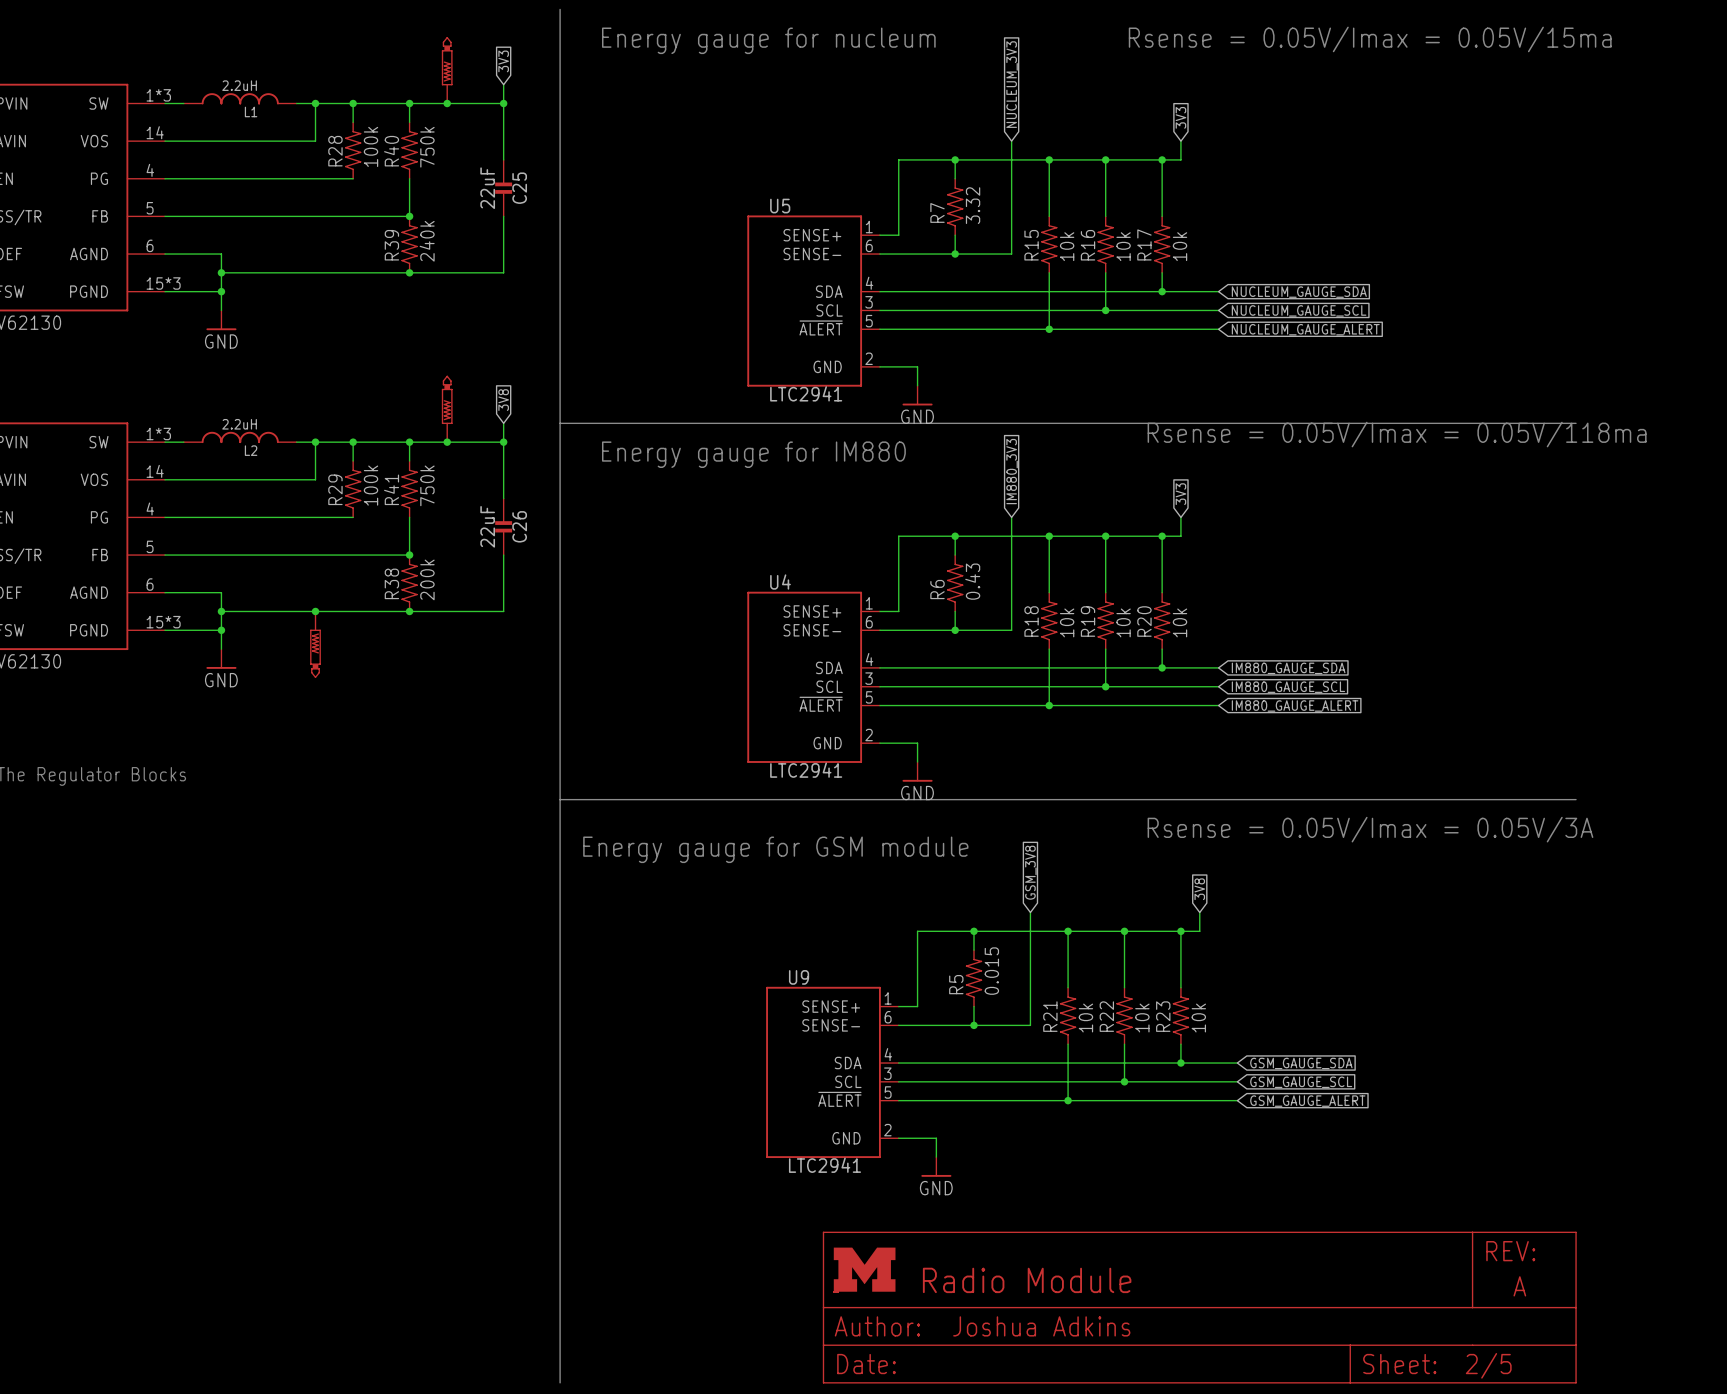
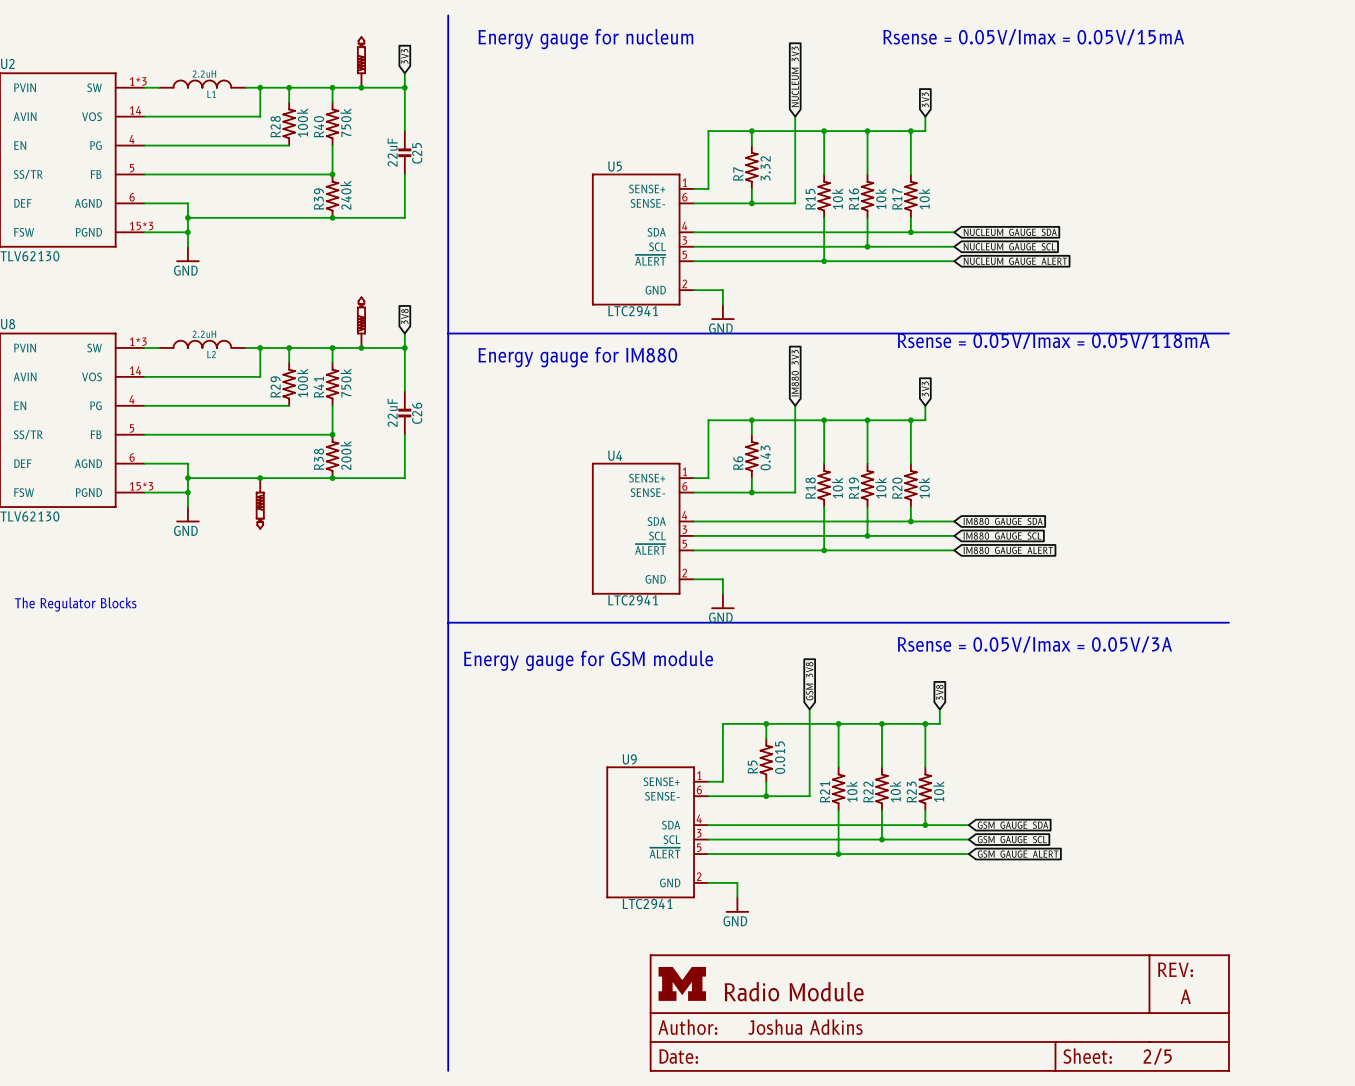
text: Rsense = 0.05V/Imax = 0.05V/15ma (1370, 39) -> Rsense = 0.05V/Imax = 0.05V/15mA (1033, 37)
text: Rsense = 0.05V/Imax = 0.05V/118ma (1397, 434) -> Rsense = 0.05V/Imax = 0.05V/118mA (1053, 340)

